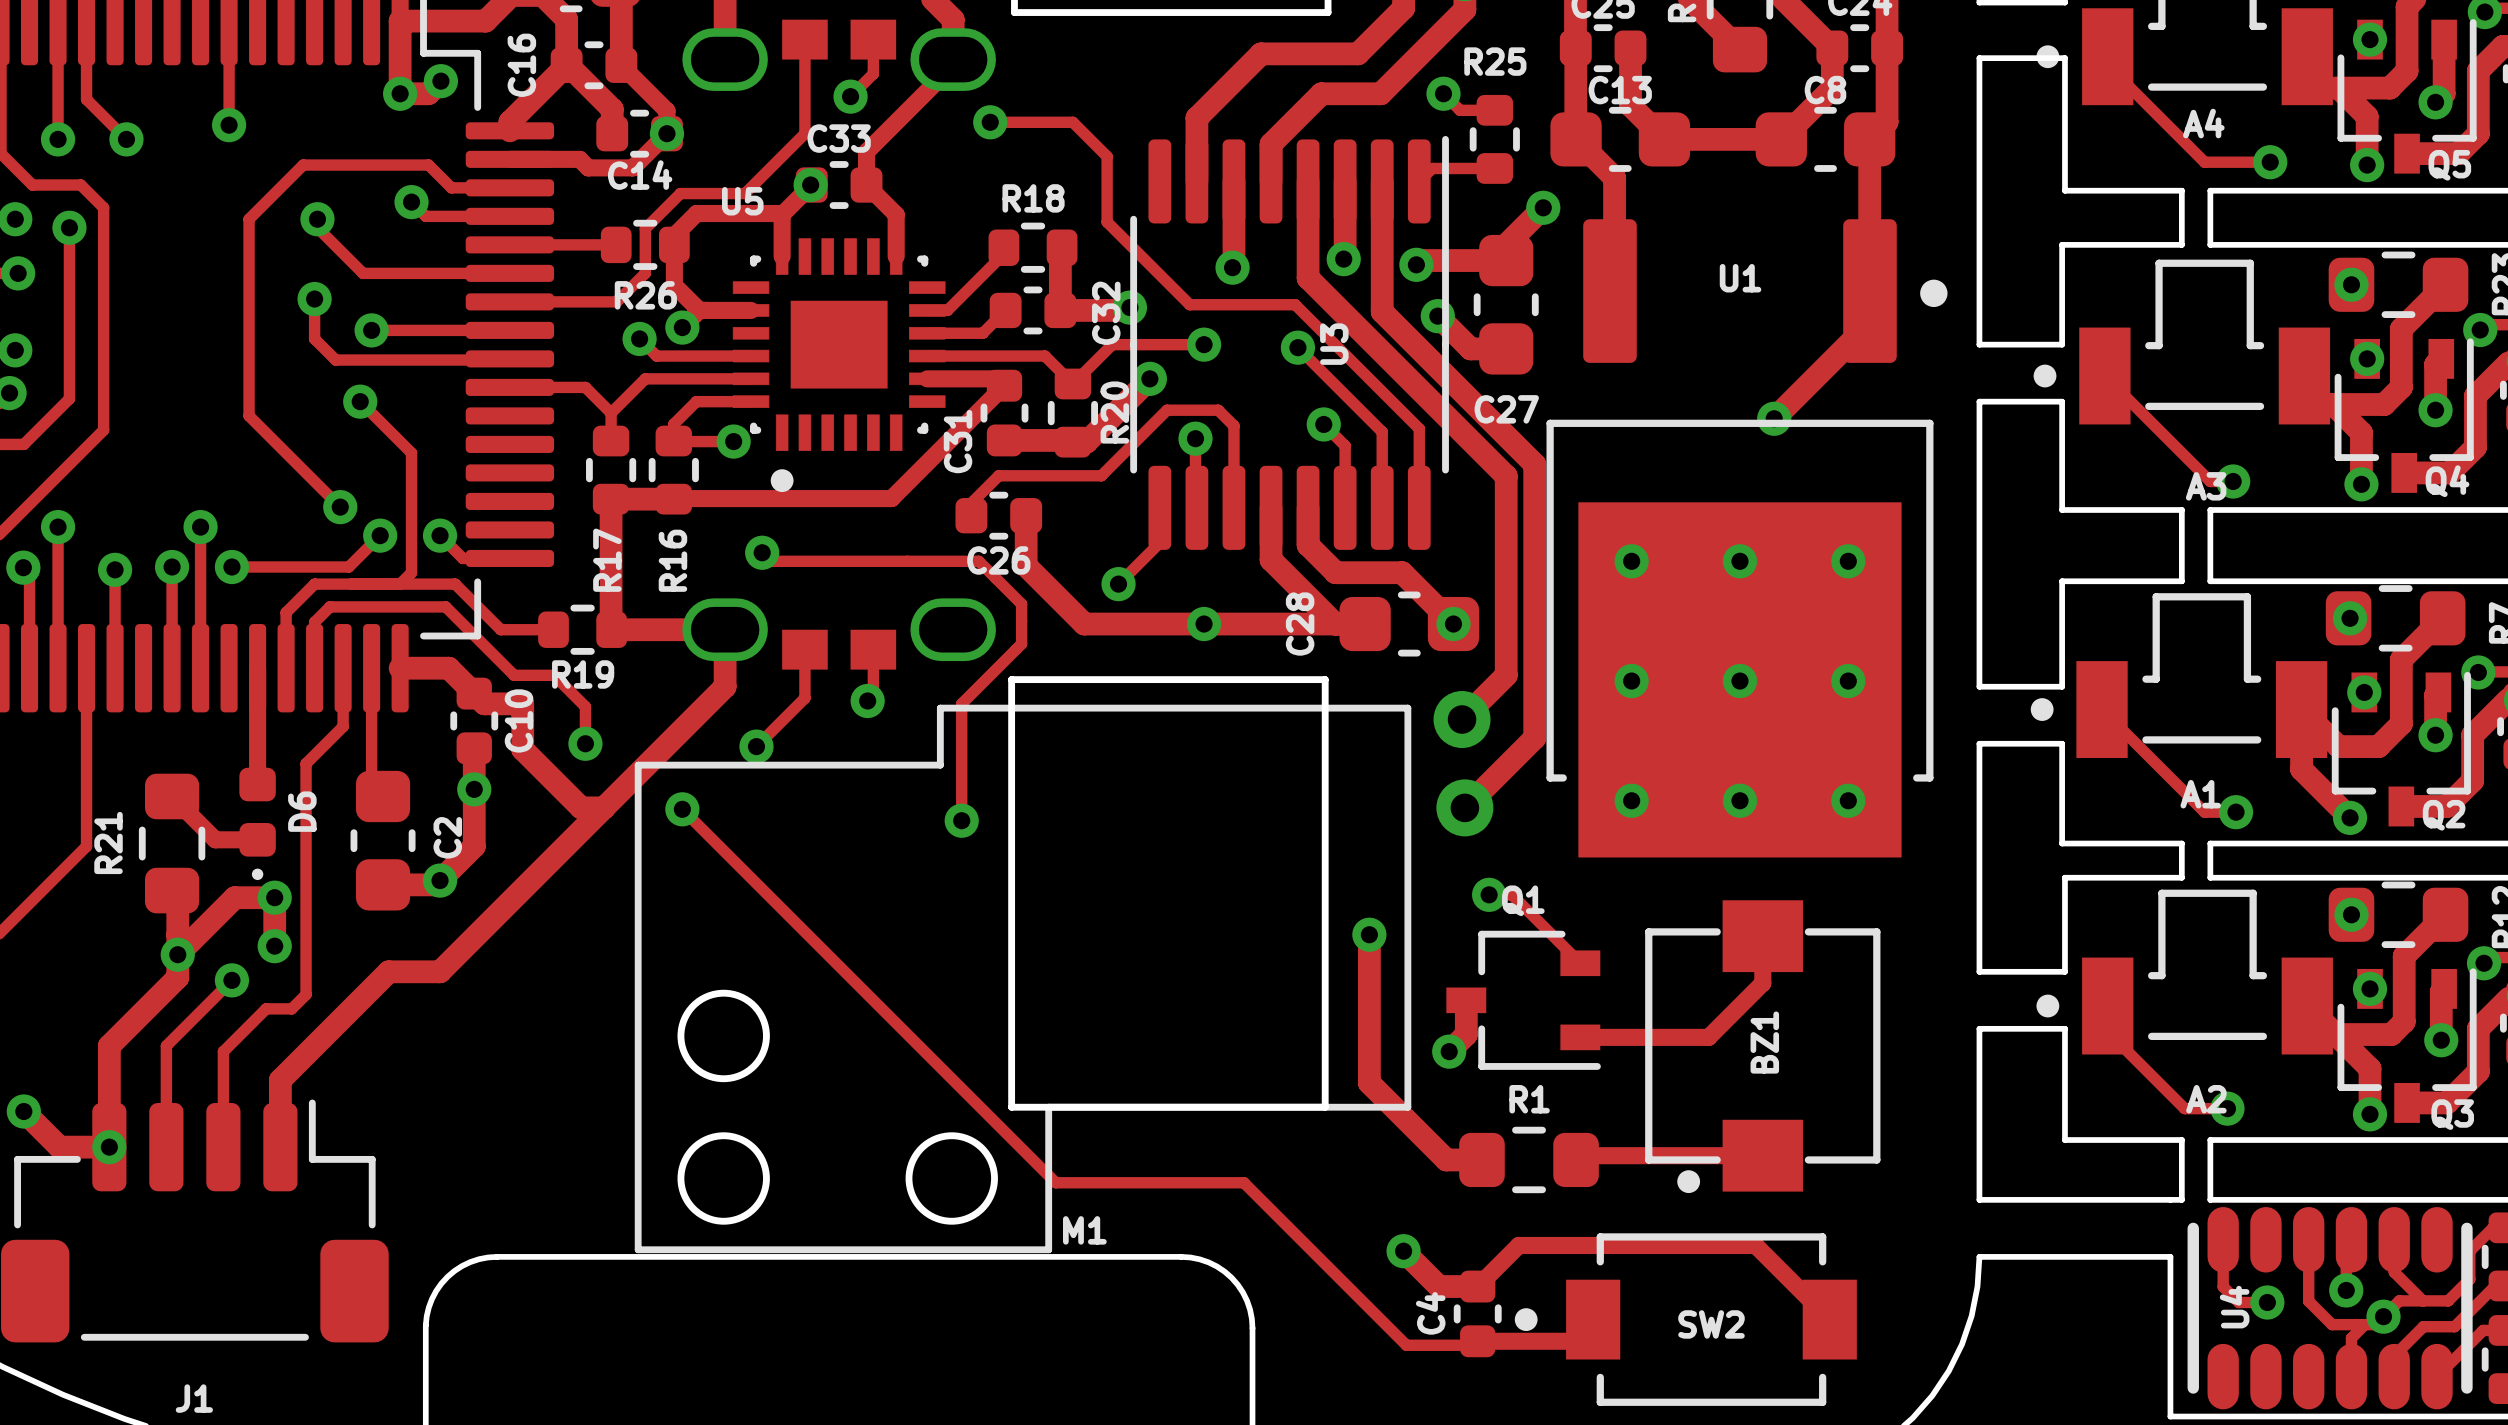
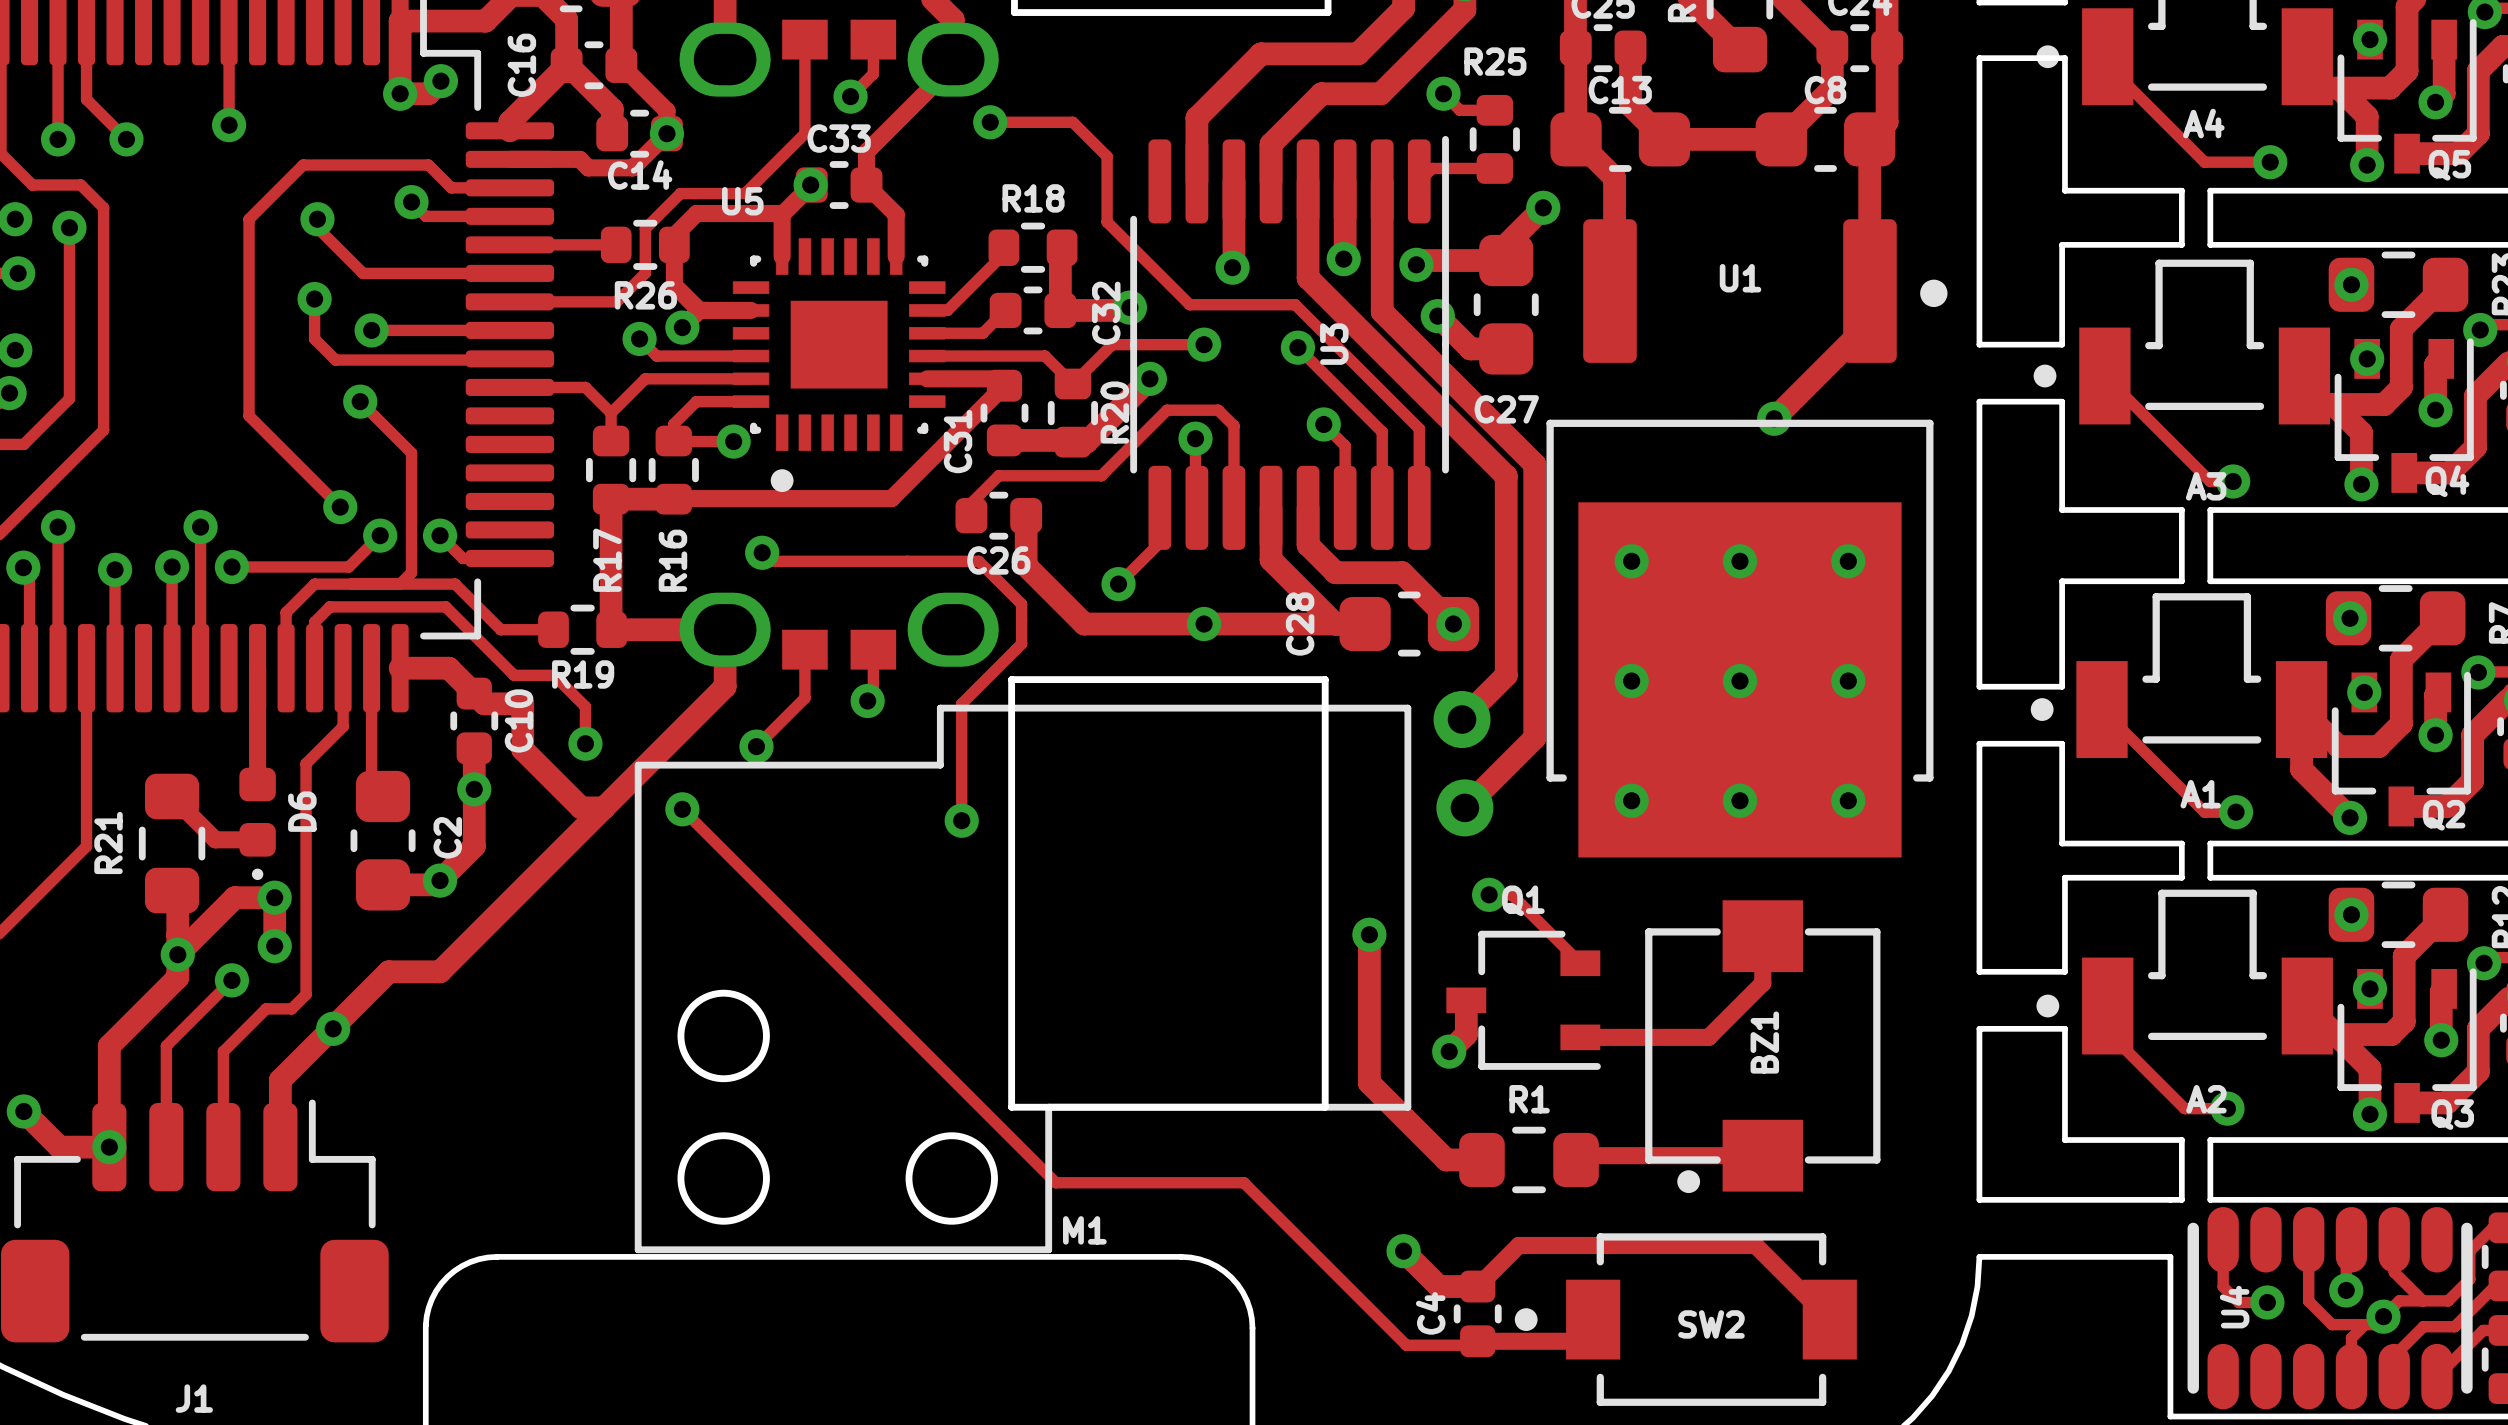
part footprint: [682, 19, 996, 91] -> [679, 19, 999, 97]
part footprint: [682, 598, 996, 670] -> [679, 592, 999, 670]
via: none -> (333, 1028)

